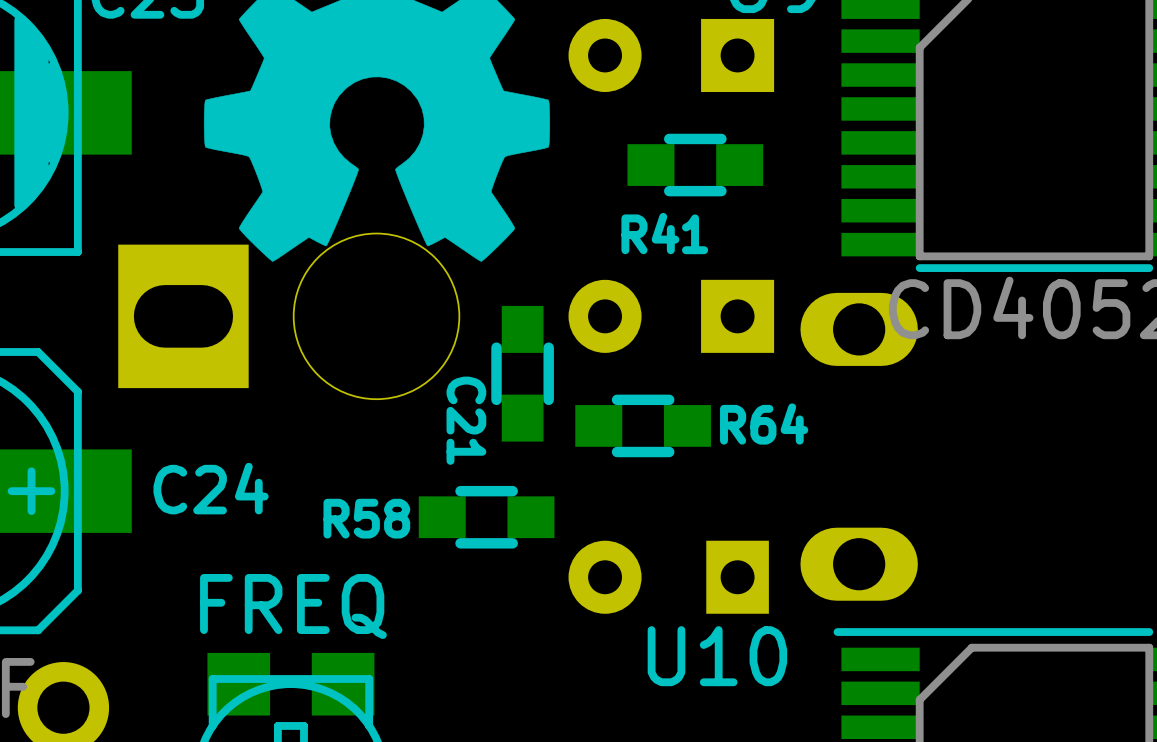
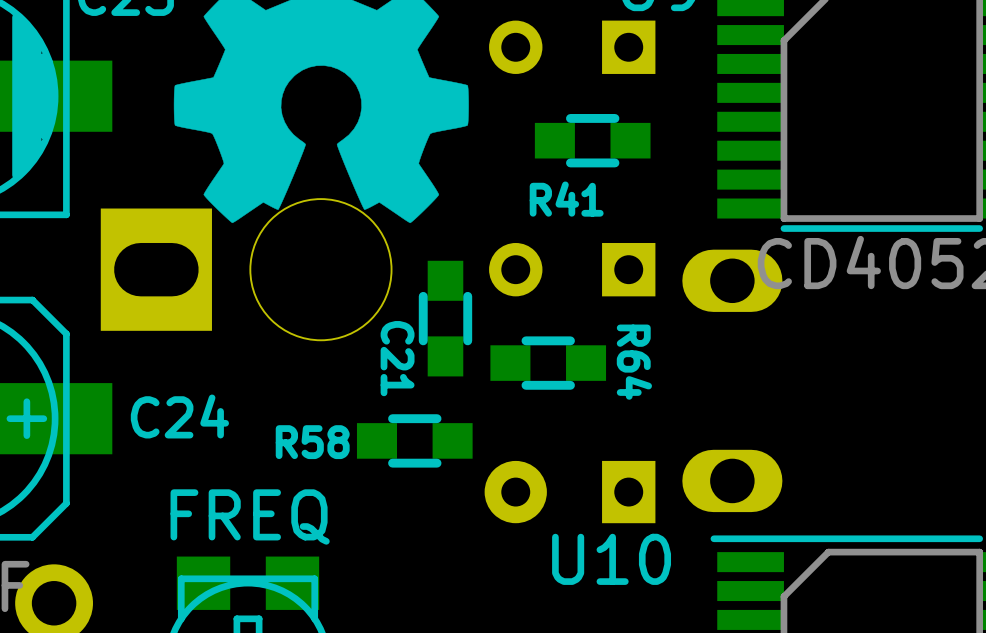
part footprint: [568, 18, 775, 92] -> [489, 20, 656, 74]
part footprint: [568, 279, 775, 353] -> [489, 242, 656, 297]
R64 name rotation: 0° (764, 423) -> 90° clockwise (634, 362)

